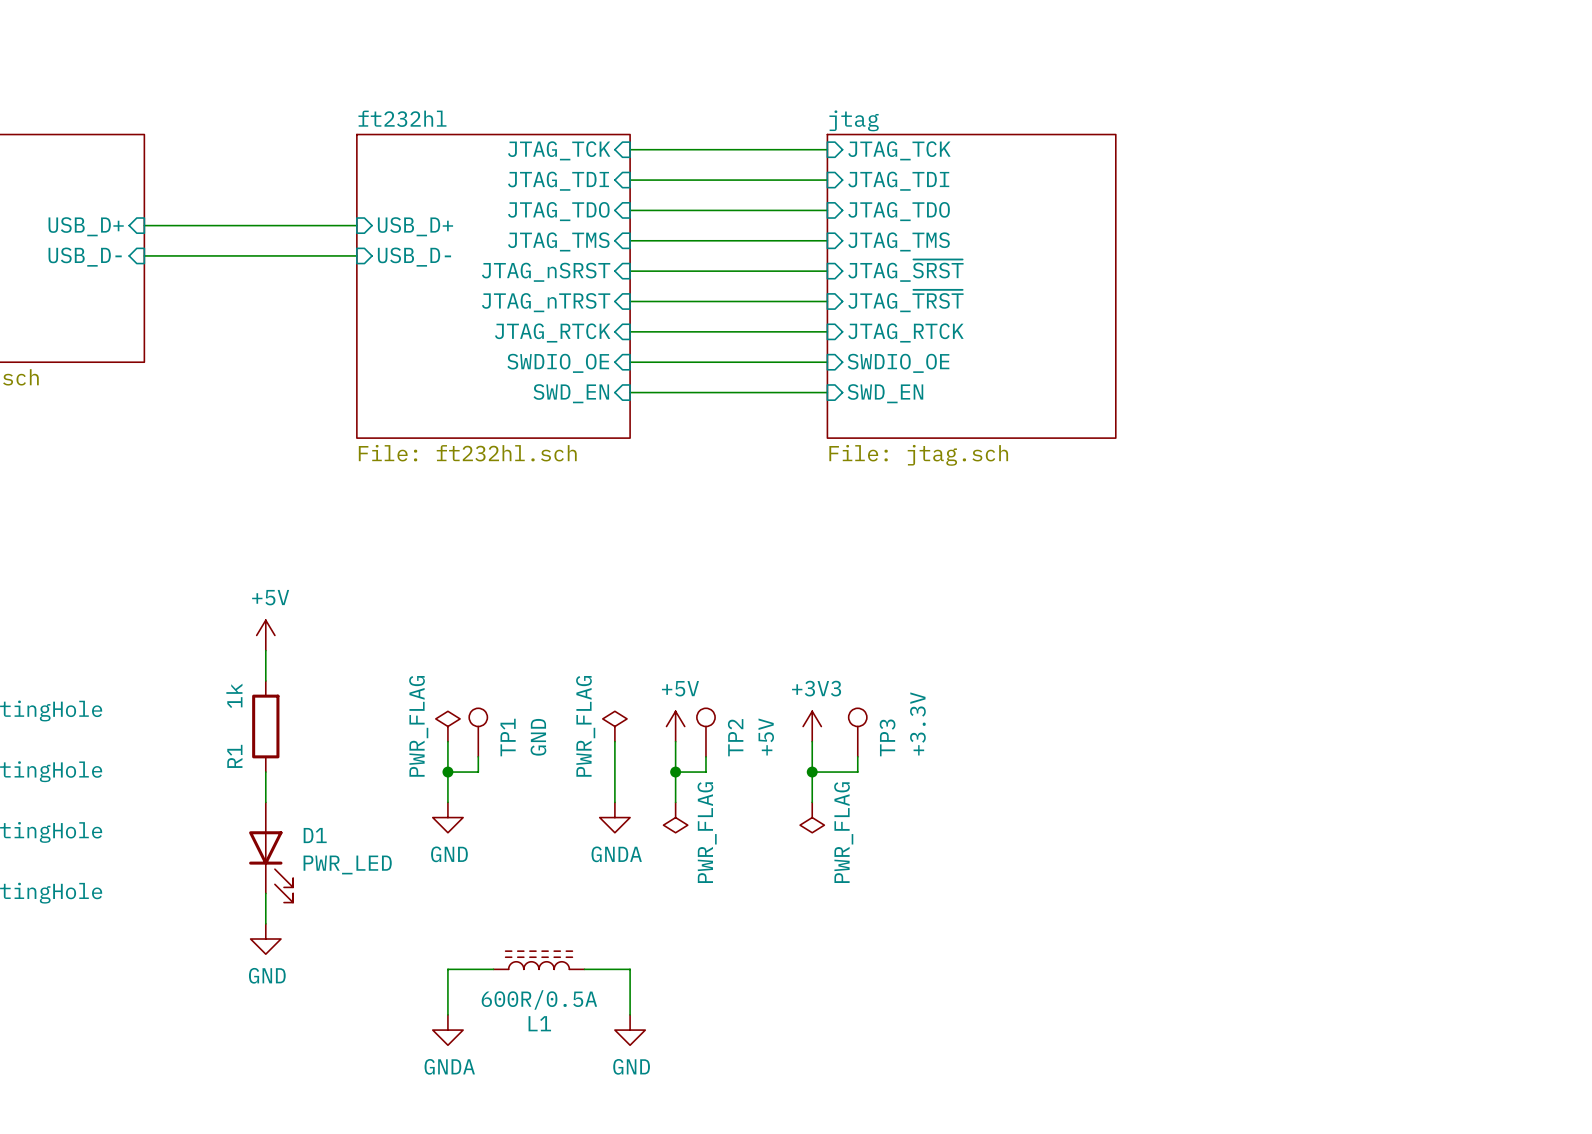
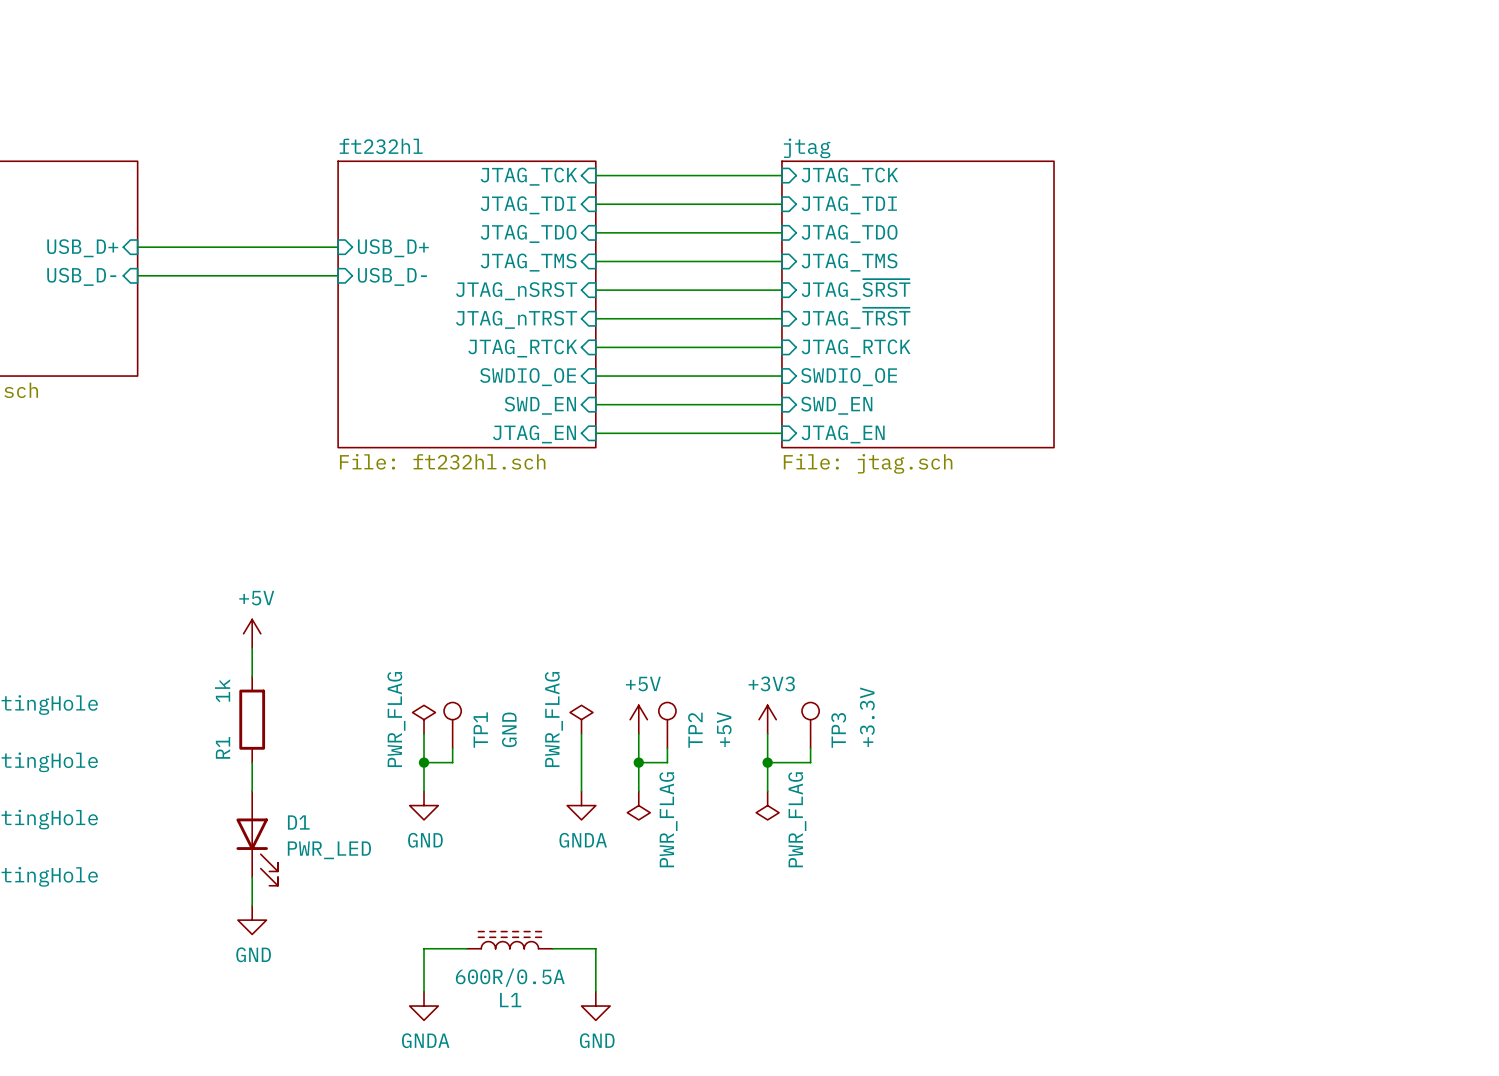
wire: none -> (595, 433) (781, 433)
sheet pin: none -> JTAG_EN (534, 434)
sheet pin: none -> JTAG_EN (843, 434)

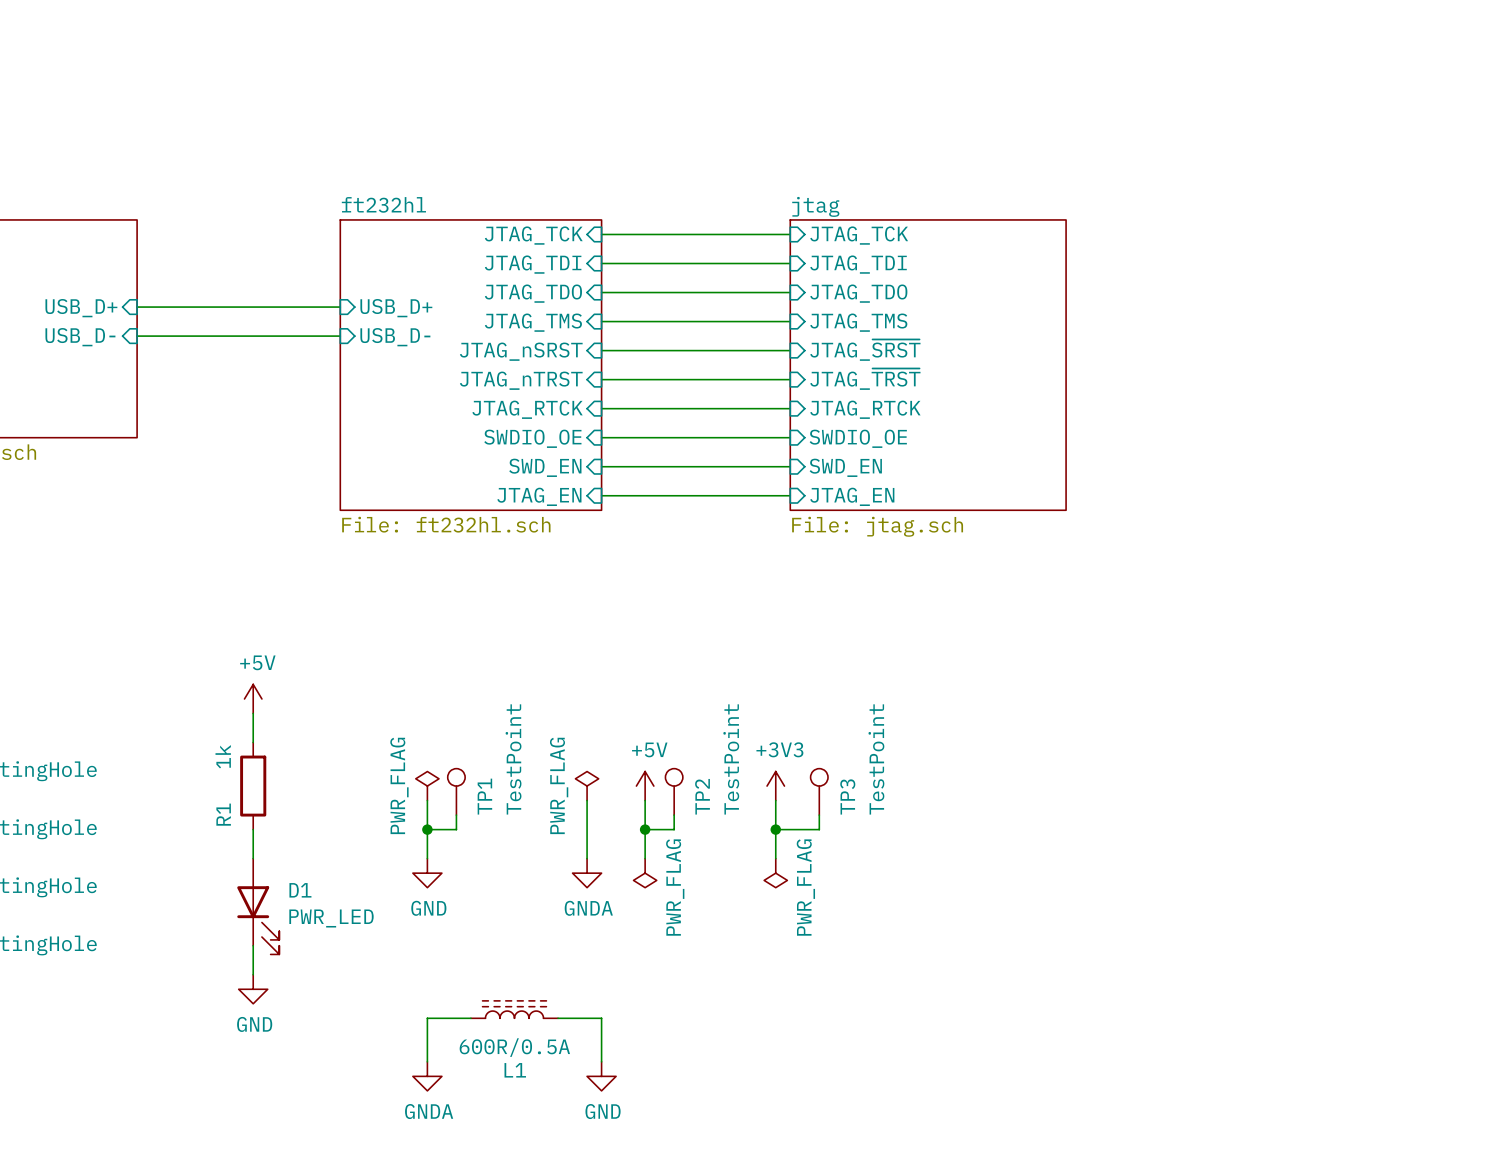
TP3 value: +3.3V (867, 717) -> TestPoint (876, 759)
TP1 value: GND (509, 729) -> TestPoint (513, 759)
TP2 value: +5V (724, 729) -> TestPoint (731, 759)

